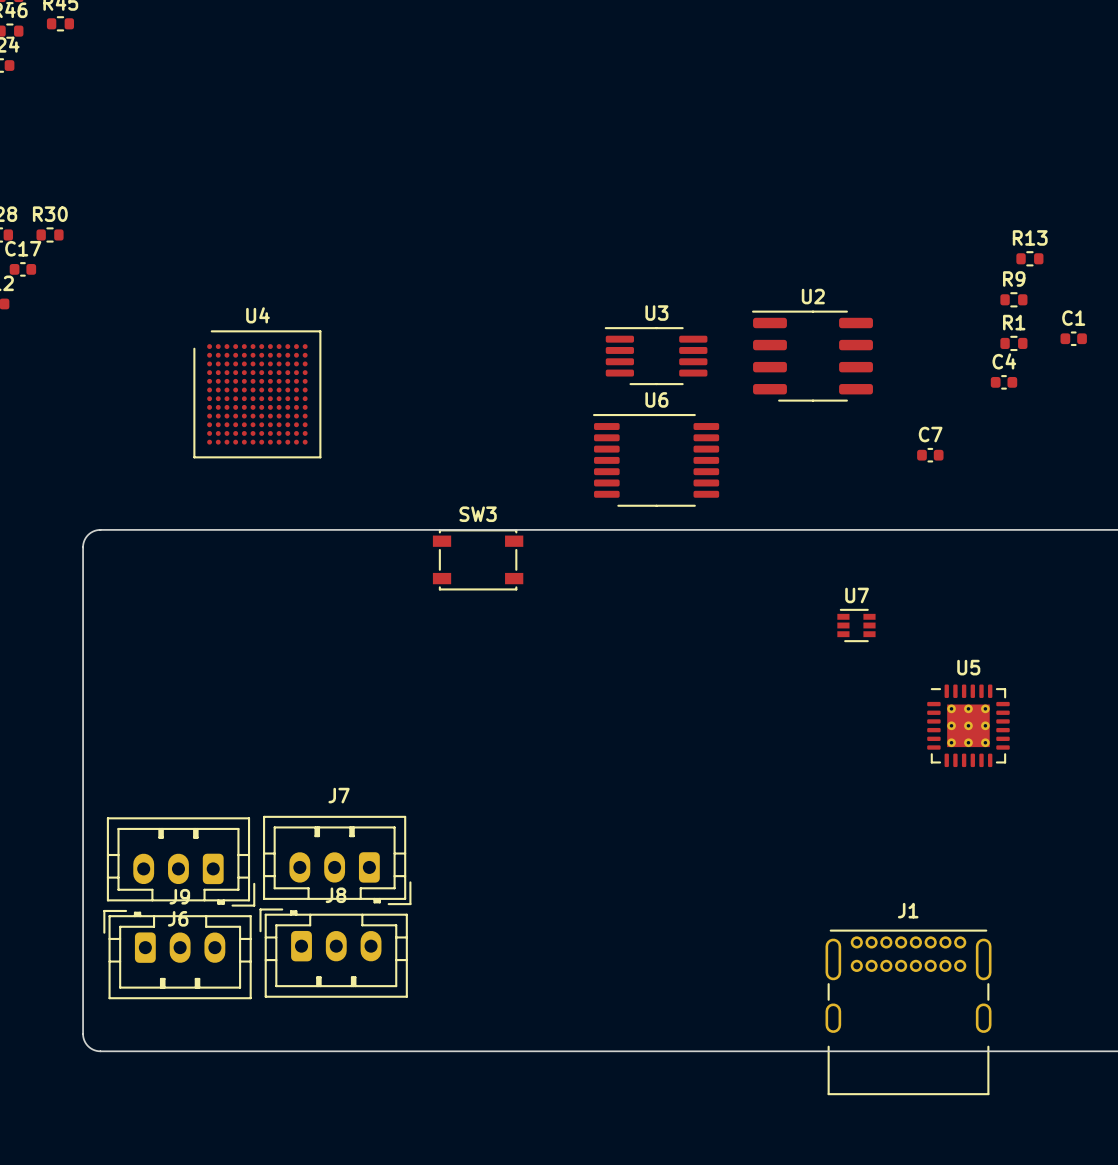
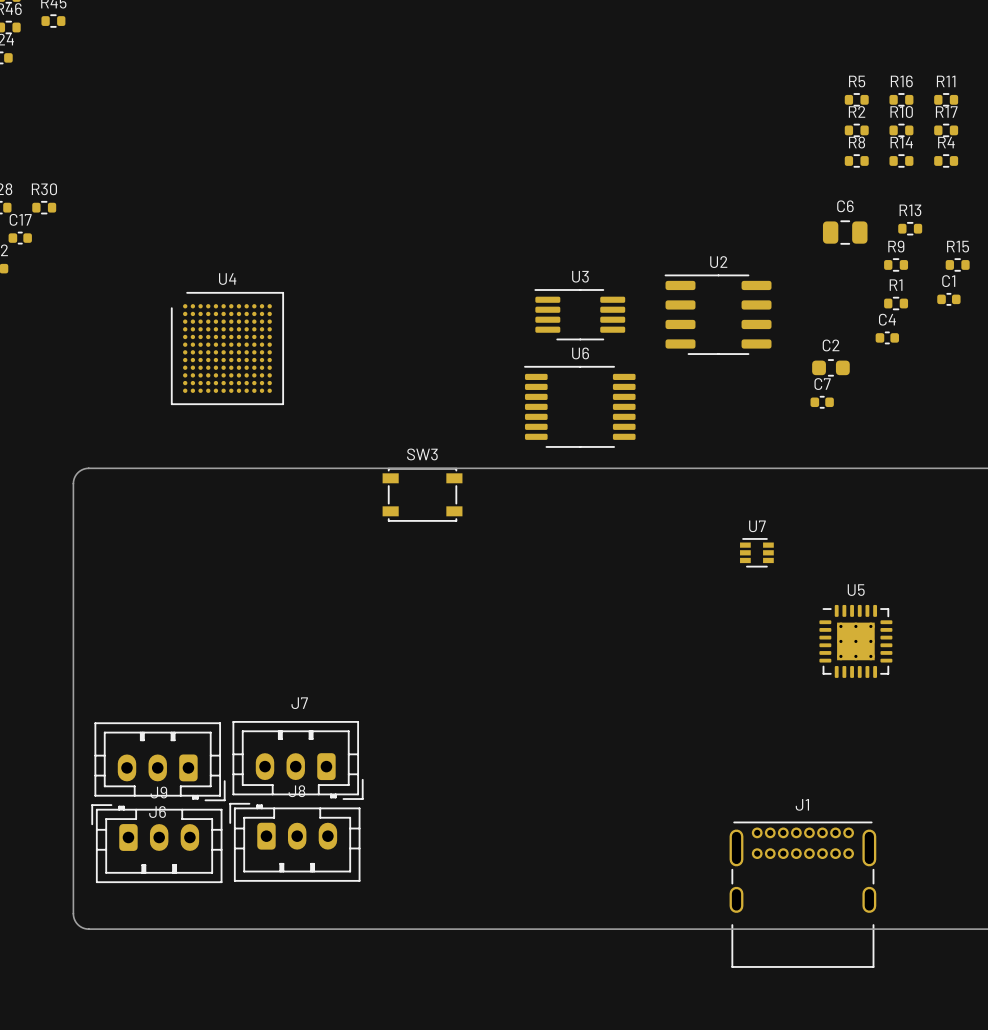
R5: none -> (856, 99)
R16: none -> (901, 99)
R11: none -> (946, 99)
R2: none -> (856, 130)
R10: none -> (901, 130)
R17: none -> (946, 130)
R8: none -> (856, 160)
R14: none -> (901, 160)
R4: none -> (946, 160)
C6: none -> (845, 232)
R15: none -> (957, 264)
C2: none -> (830, 367)

